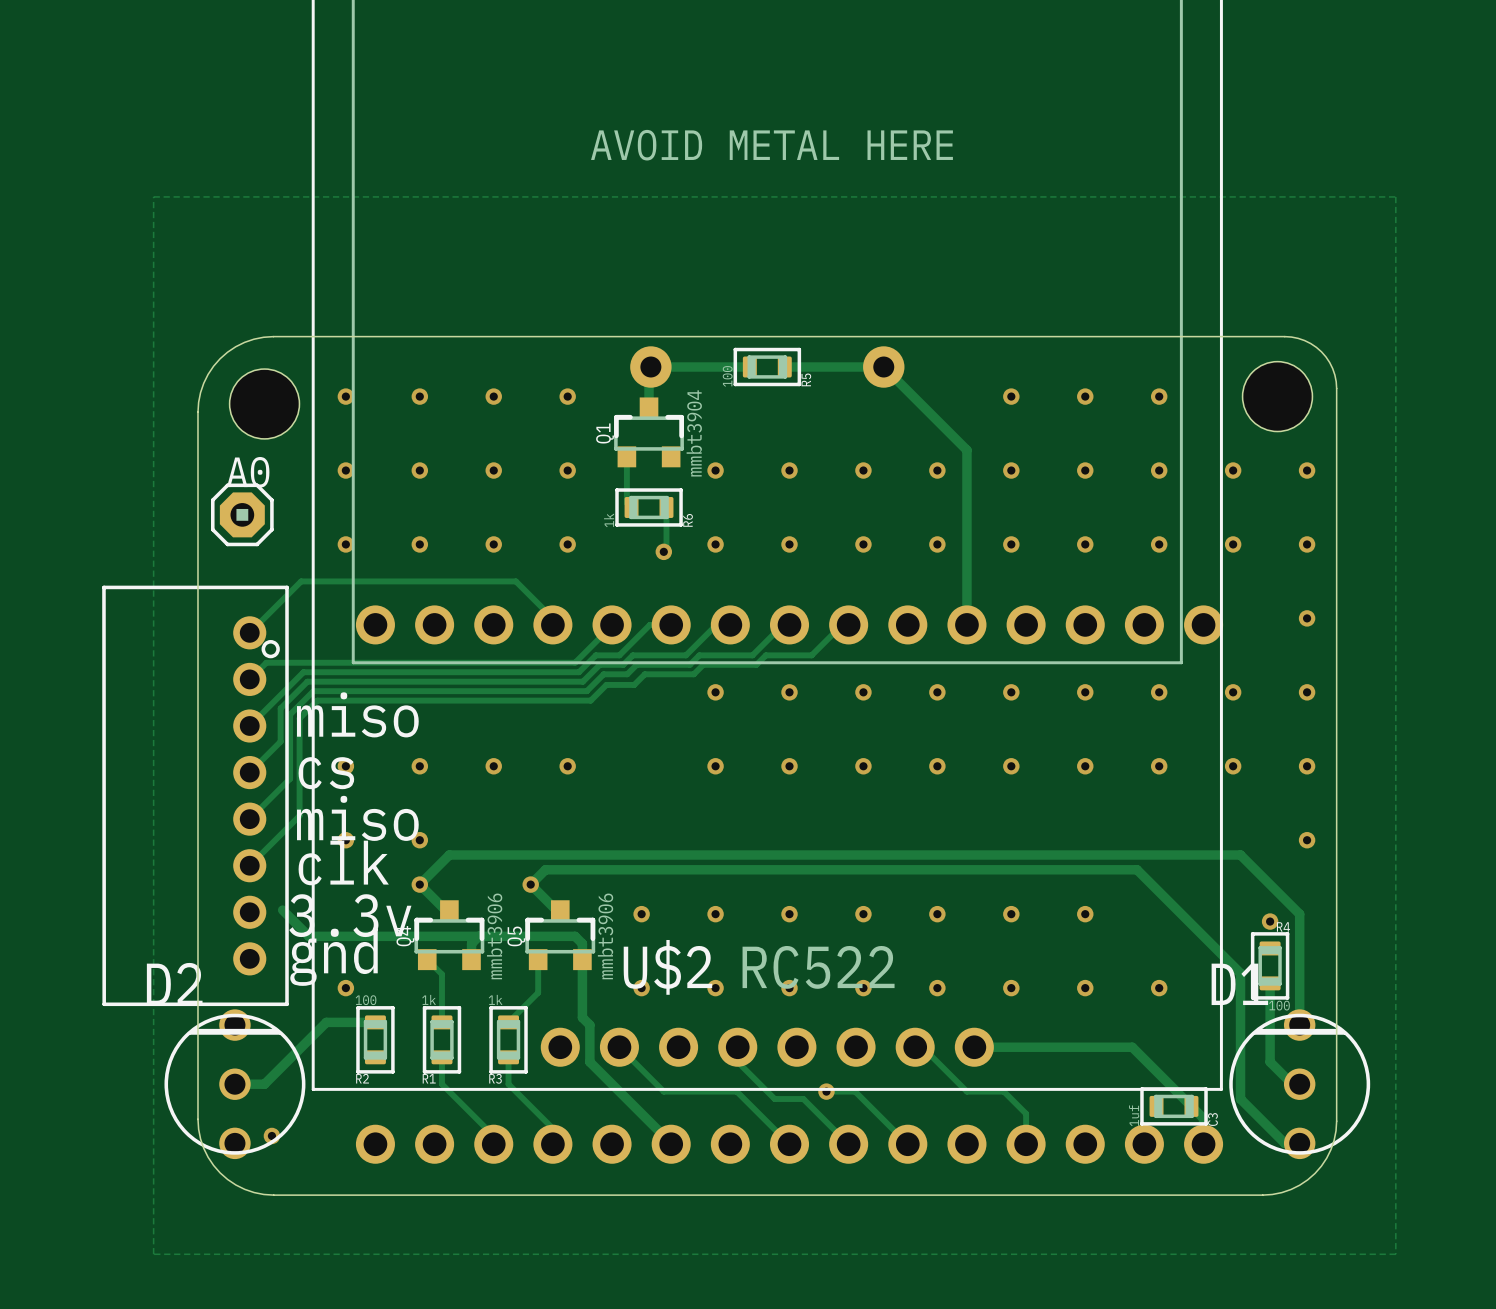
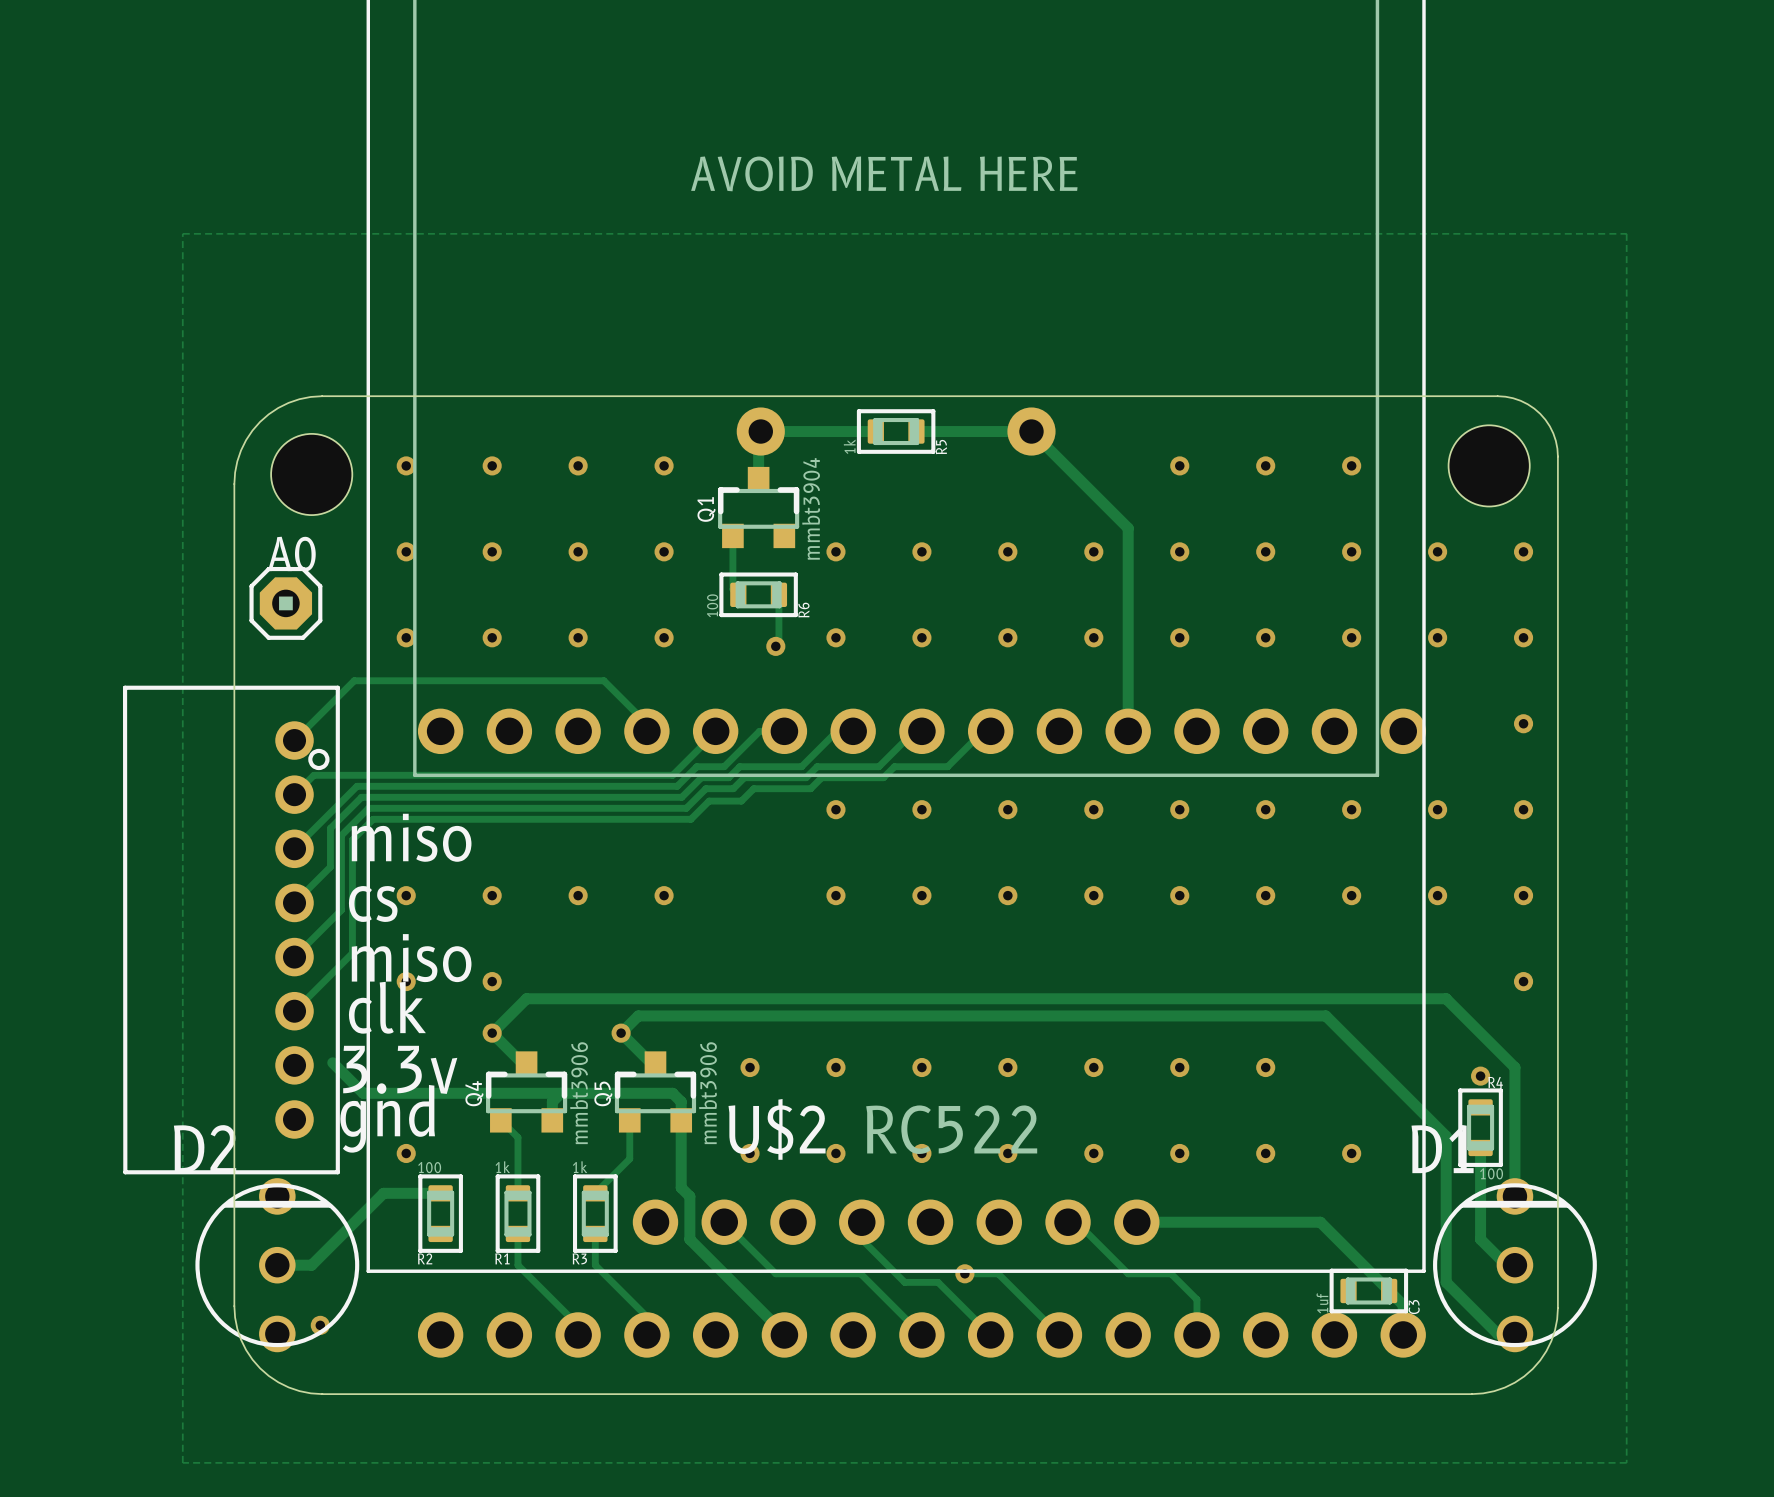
R5 value: 100 (727, 376) -> 1k (849, 446)
R6 value: 1k (609, 520) -> 100 (712, 605)

